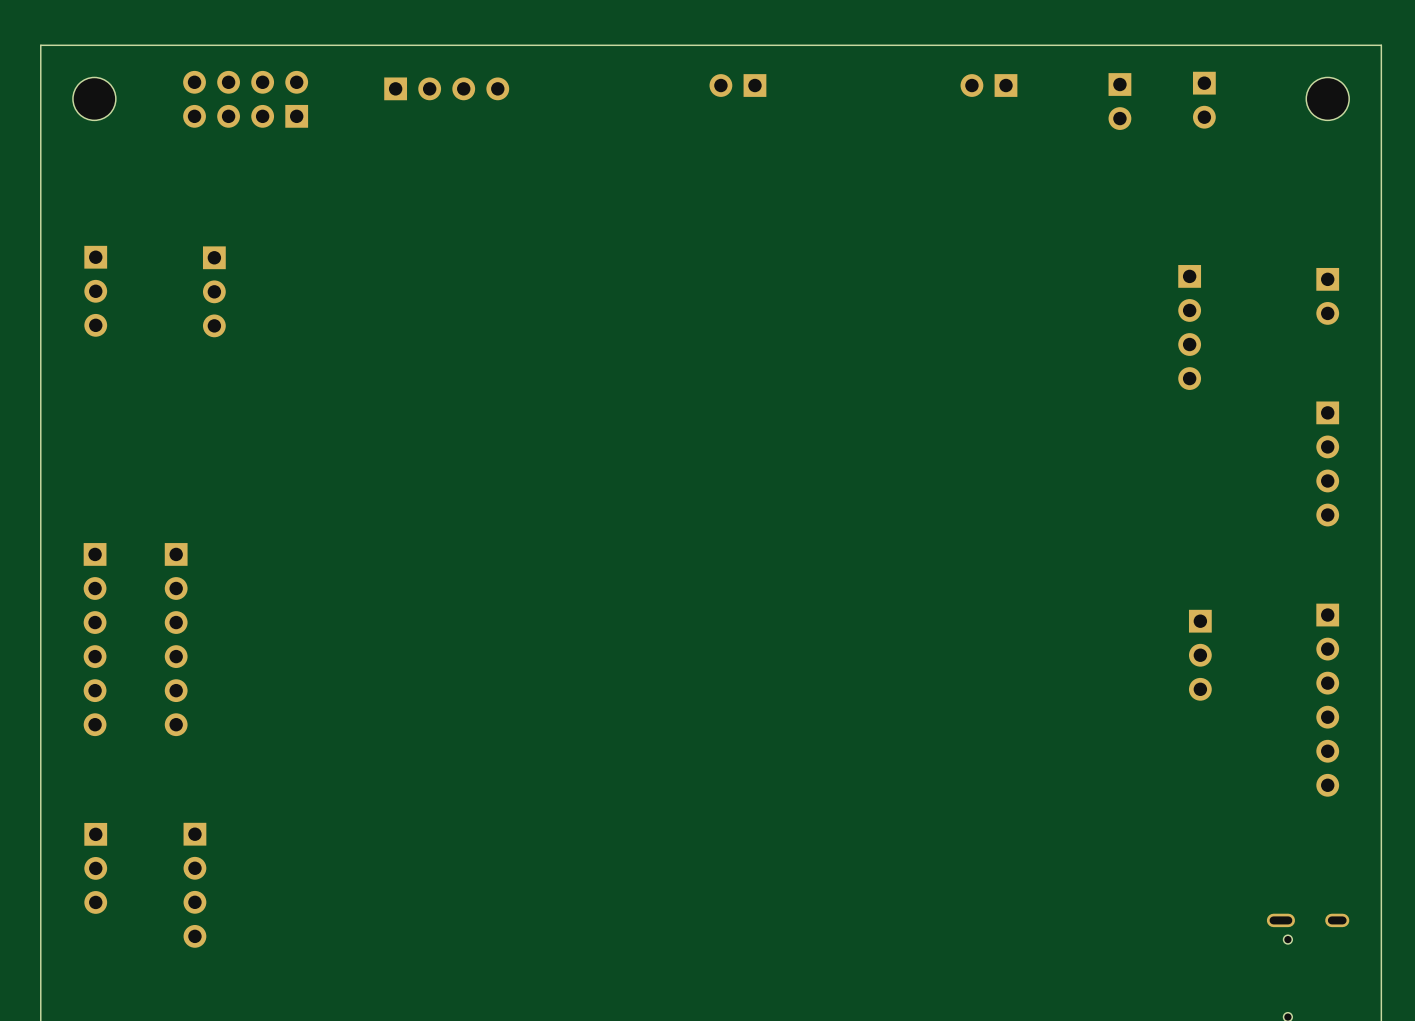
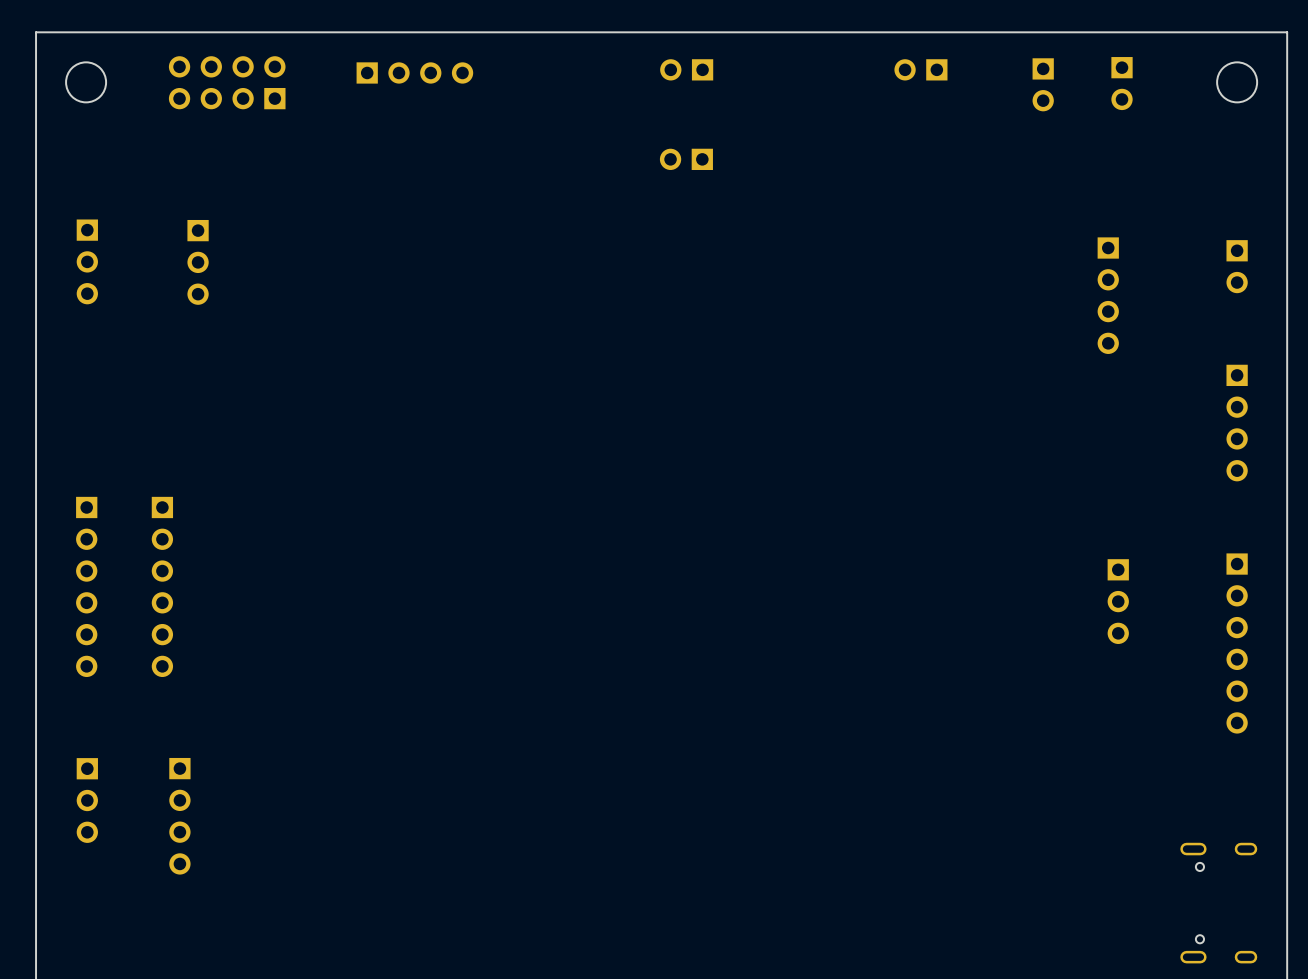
part: none -> (686, 159)

